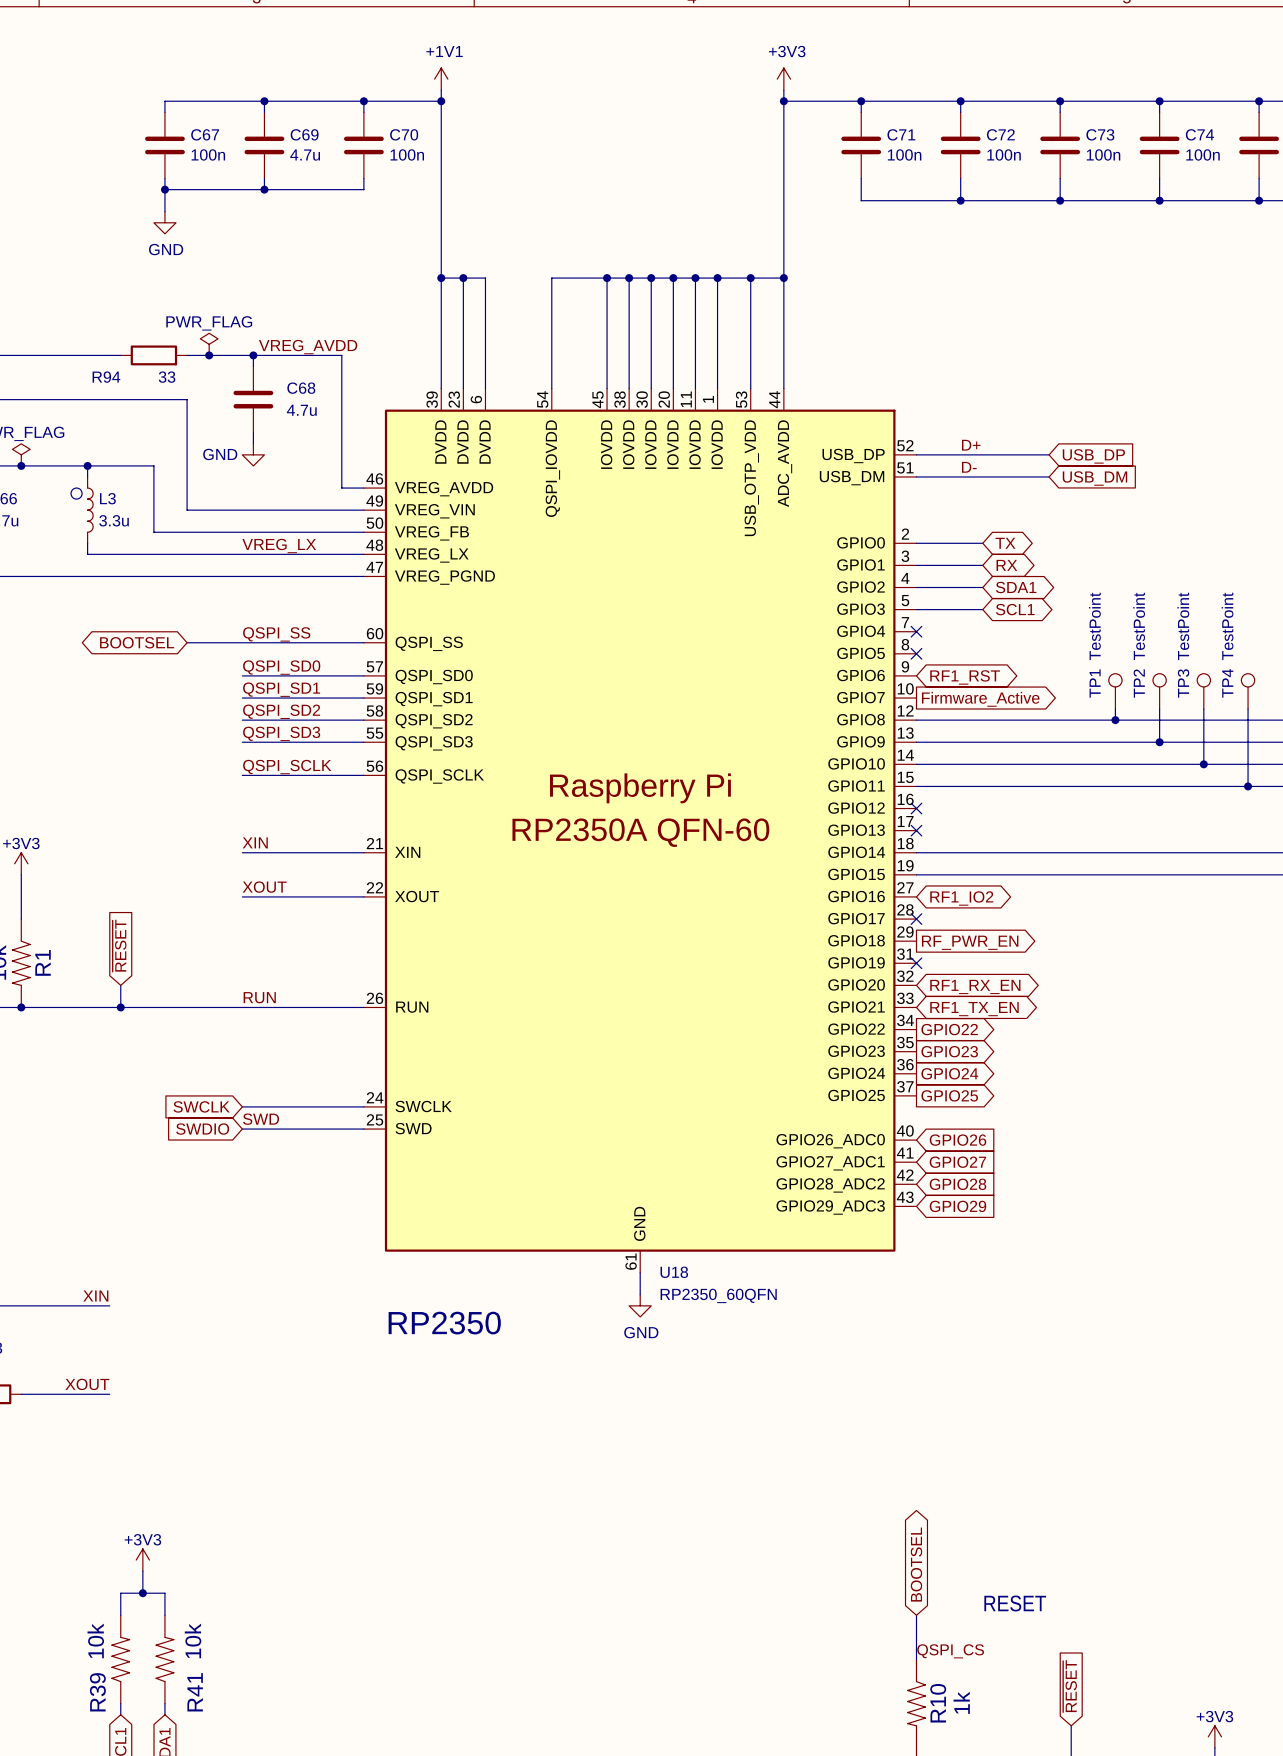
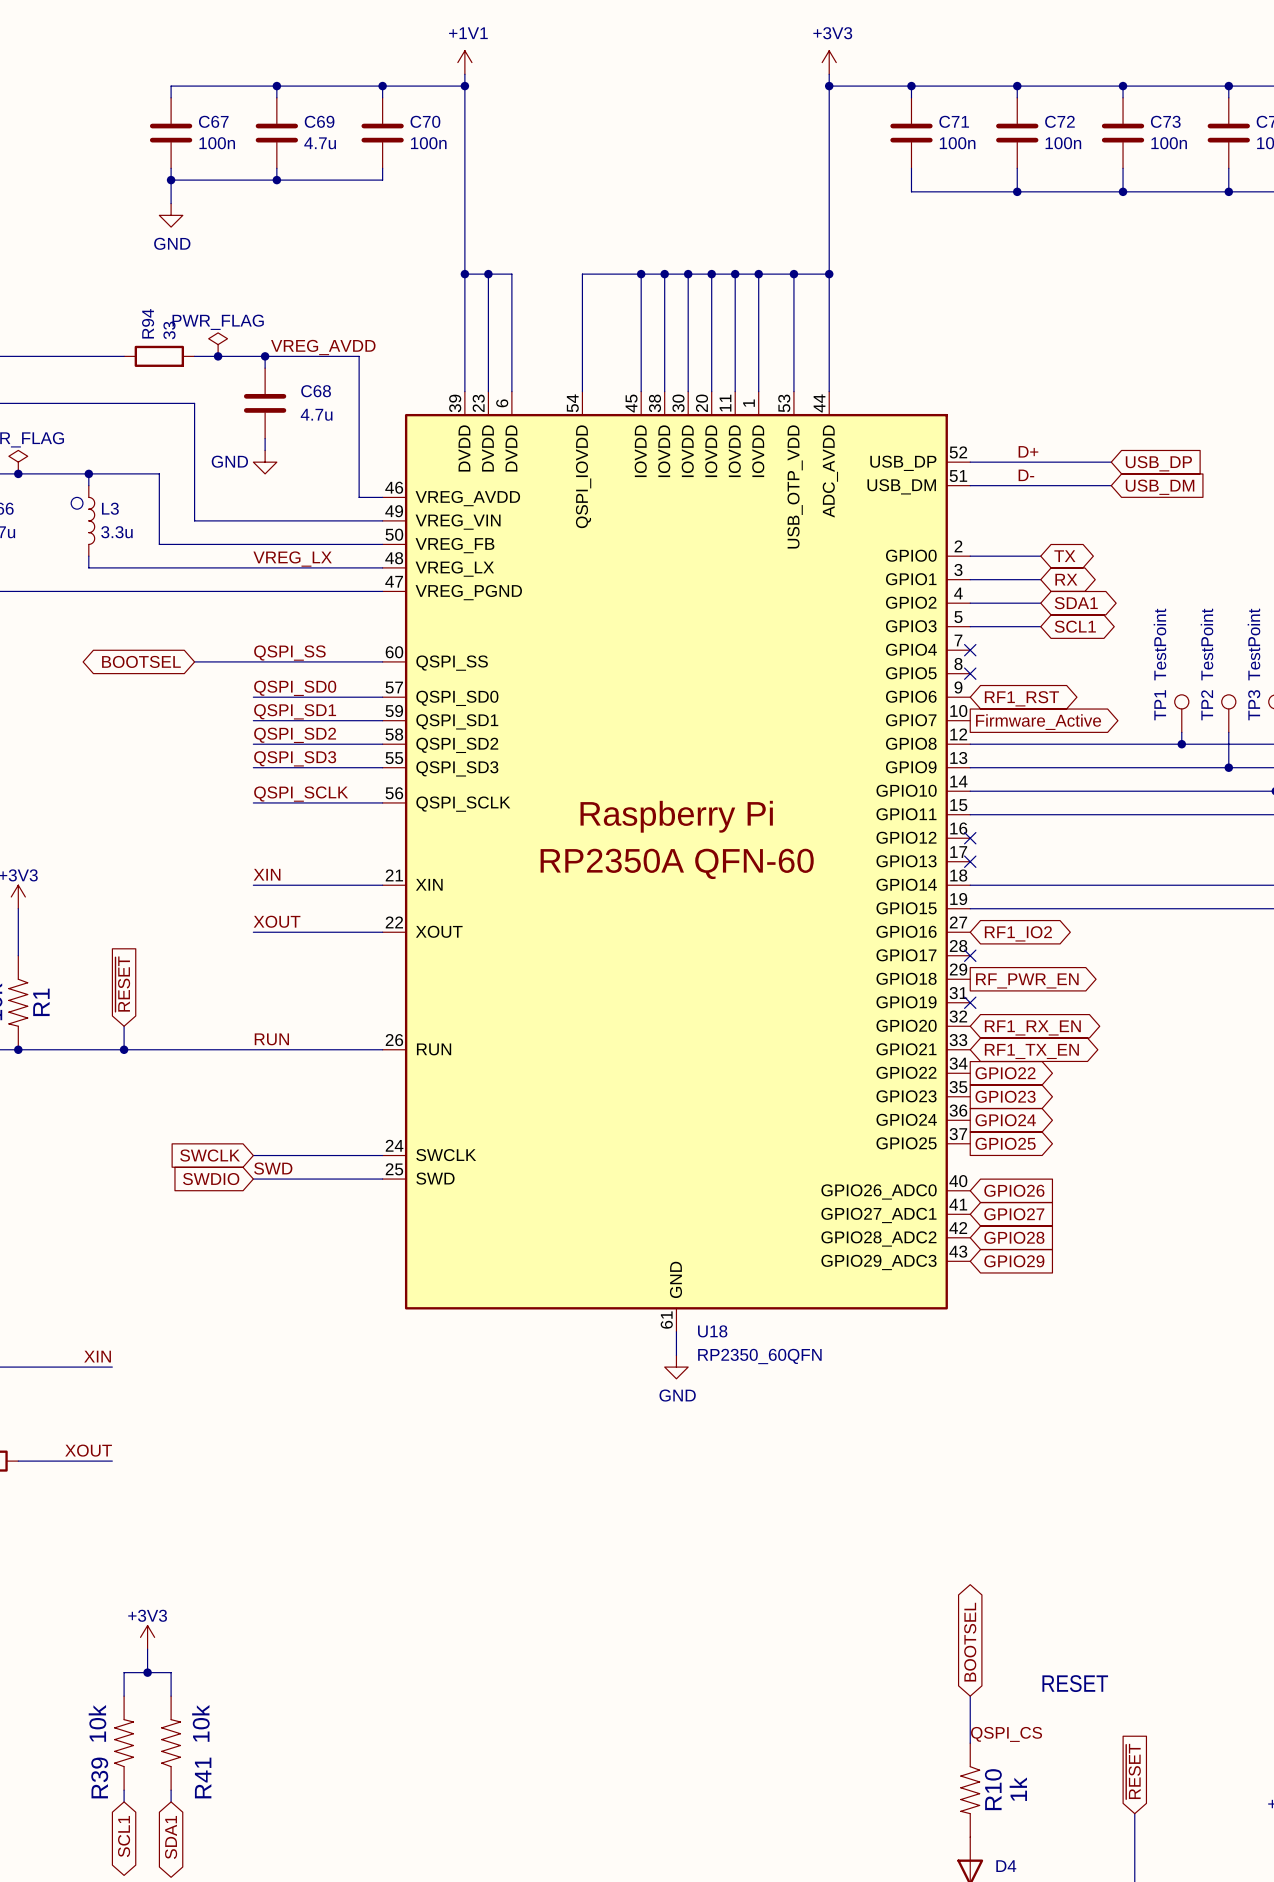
R94 name rotation: 0° (106, 377) -> 90° counterclockwise (148, 323)
R94 name position: R94 (106, 377) -> R94 (148, 323)
R94 value rotation: 0° (167, 377) -> 90° counterclockwise (169, 330)
R94 value position: 33 (167, 377) -> 33 (169, 330)
text: RP2350 (444, 1323) -> none

